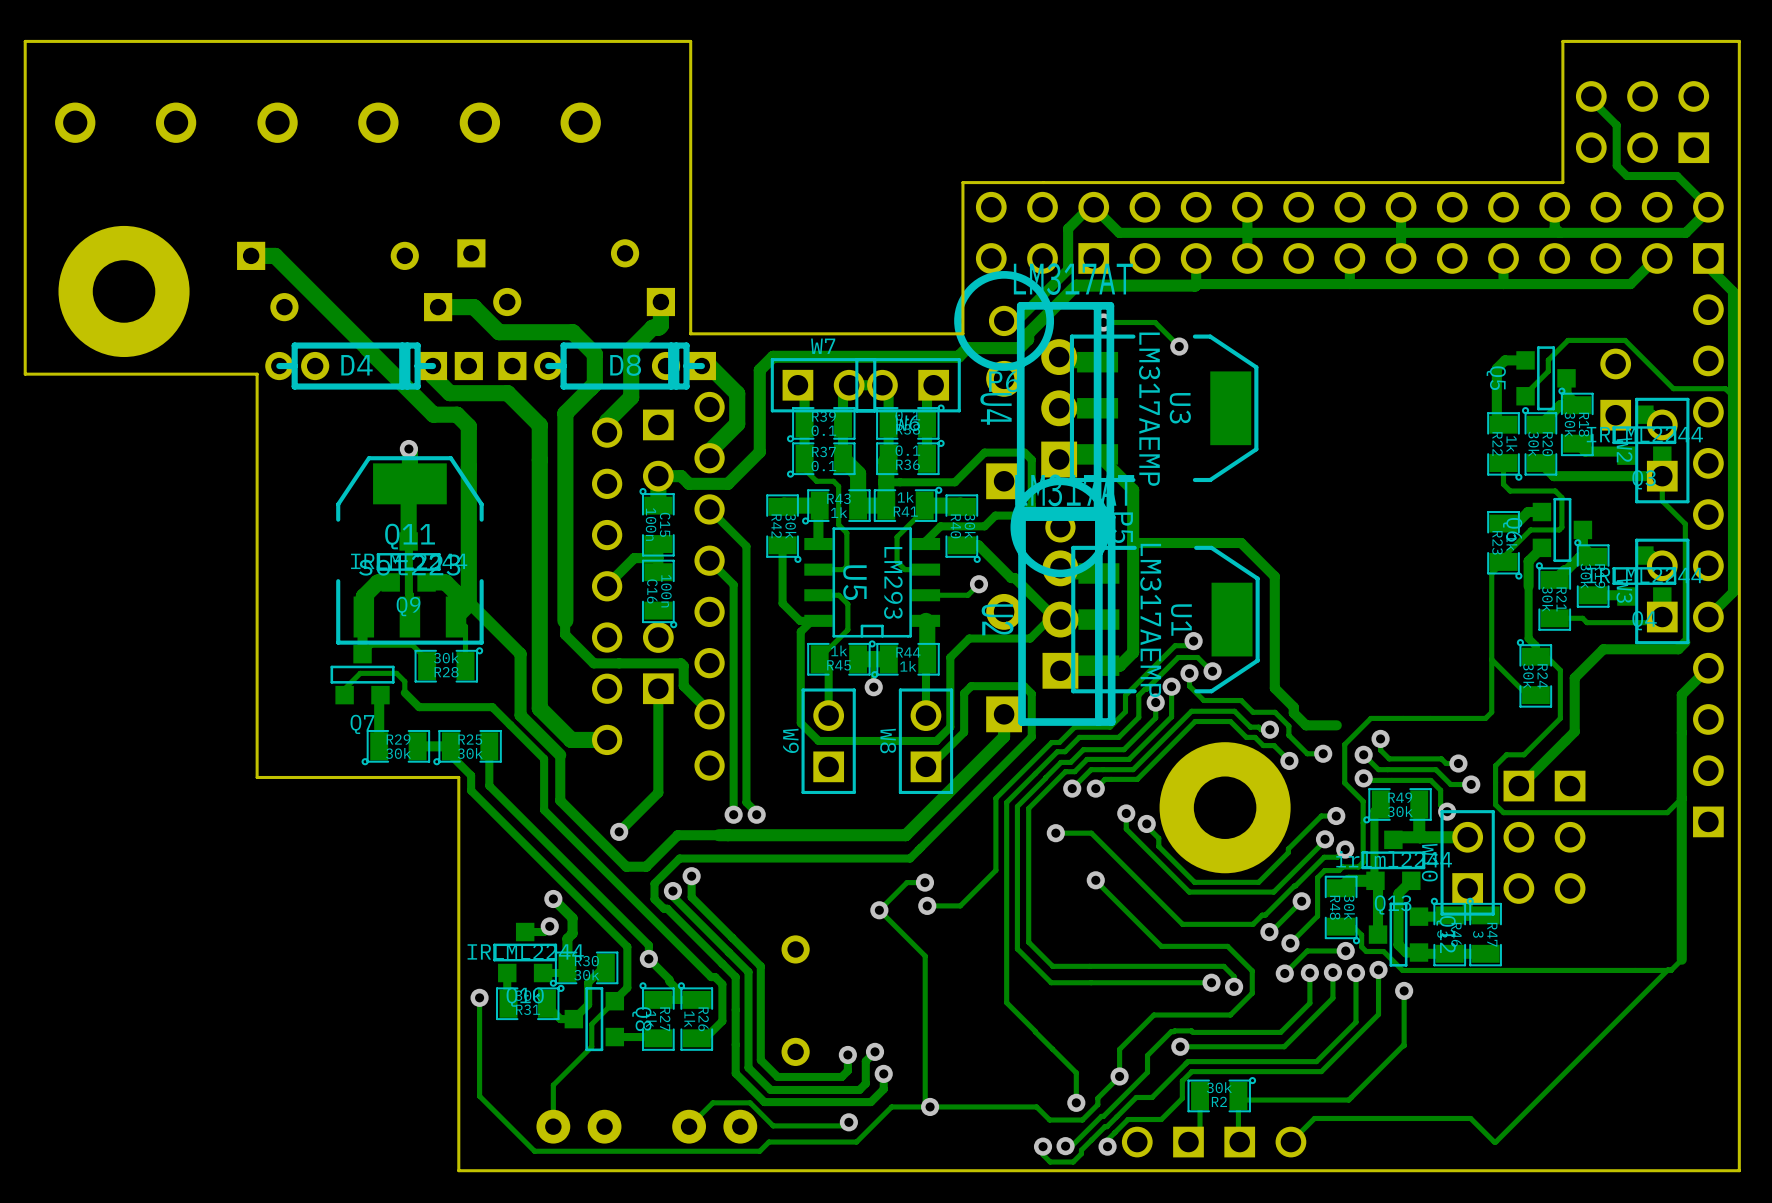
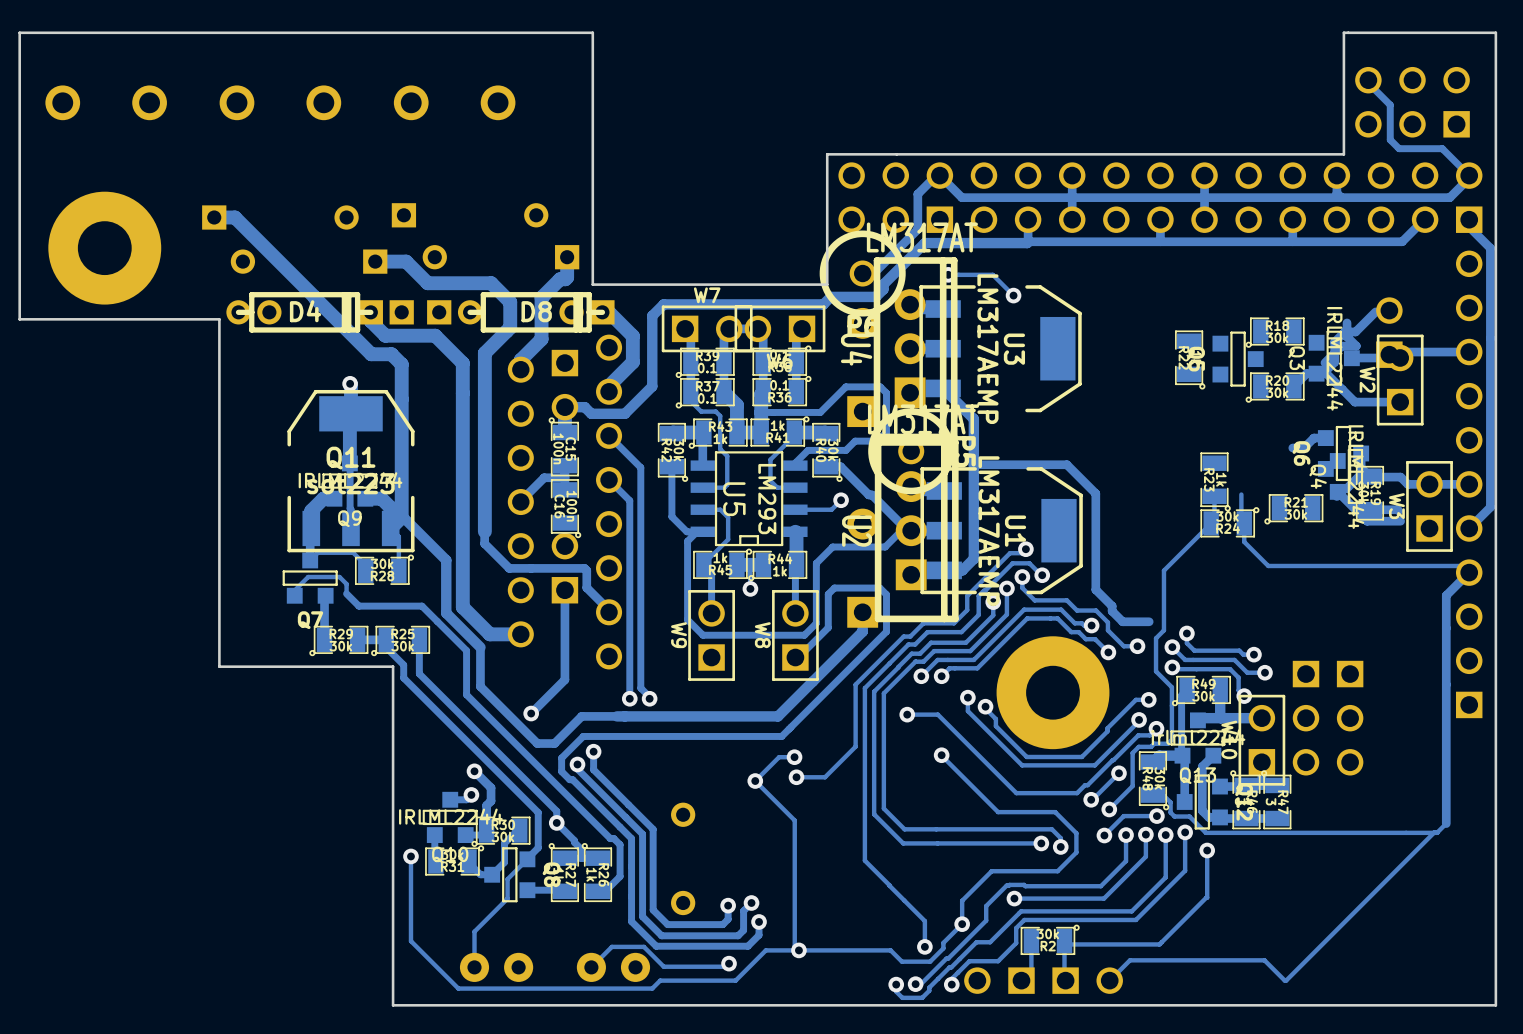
track: (1525, 360) (1505, 360) (1496, 368) (1496, 418) (1503, 424) -> none
track: none -> (1375, 311) (1355, 331) (1344, 331) (1334, 342) (1334, 362) (1323, 373)
Q5 position: (1546, 378) -> (1238, 359)
track: (1732, 396) (1725, 388) (1673, 388) (1625, 340) (1568, 340) (1548, 360) (1548, 371) (1525, 396) -> none
track: none -> (1469, 352) (1406, 352) (1400, 357) (1352, 357)
R18 rotation: 0° (1575, 421) -> 90° counterclockwise (1275, 332)
R18 position: (1575, 421) -> (1275, 332)
Q3 rotation: 0° (1644, 435) -> 90° clockwise (1334, 358)
Q3 position: (1644, 435) -> (1334, 358)
R20 rotation: 0° (1539, 441) -> 90° counterclockwise (1275, 387)
R20 position: (1539, 441) -> (1275, 387)
track: (1577, 443) (1585, 451) (1622, 451) (1626, 455) -> none
R22 position: (1504, 446) -> (1190, 359)
W2 position: (1662, 450) -> (1400, 380)
track: none -> (1293, 386) (1306, 373) (1326, 373) (1354, 402) (1400, 402)
track: (1503, 463) (1503, 484) (1510, 491) (1555, 491) (1561, 497) (1561, 527) (1559, 529) (1530, 529) (1503, 557) (1503, 561) (1491, 573) (1491, 712) (1485, 718) (1370, 718) (1353, 735) -> (1214, 496) (1214, 520) (1163, 570) (1163, 630)
track: (1540, 463) (1553, 476) (1662, 476) -> none
track: (1662, 476) (1662, 501) (1685, 524) (1685, 642) (1678, 649) (1603, 649) (1574, 677) (1574, 731) (1518, 786) -> none
R23 position: (1504, 545) -> (1215, 481)
track: (1541, 547) (1528, 561) (1528, 638) (1535, 645) (1535, 656) (1546, 656) (1560, 670) (1560, 718) (1524, 754) (1506, 754) (1495, 765) (1495, 804) (1503, 812) (1667, 812) (1681, 798) -> none
track: none -> (1373, 476) (1400, 477) (1407, 484) (1469, 484)
track: none -> (1337, 491) (1367, 521) (1400, 521)
Q4 rotation: 0° (1644, 576) -> 90° clockwise (1355, 476)
Q4 position: (1644, 576) -> (1355, 476)
track: none -> (1241, 494) (1241, 520) (1244, 523) (1244, 541) (1268, 565) (1462, 565) (1469, 572)
R21 rotation: 0° (1553, 596) -> 90° counterclockwise (1293, 509)
R21 position: (1553, 596) -> (1293, 509)
track: (1662, 596) (1662, 617) (1656, 622) (1587, 622) (1582, 618) (1554, 618) -> none
track: (1491, 659) (1527, 695) (1535, 695) -> none
R24 rotation: 0° (1534, 673) -> 90° clockwise (1229, 522)
R24 position: (1534, 673) -> (1229, 522)

